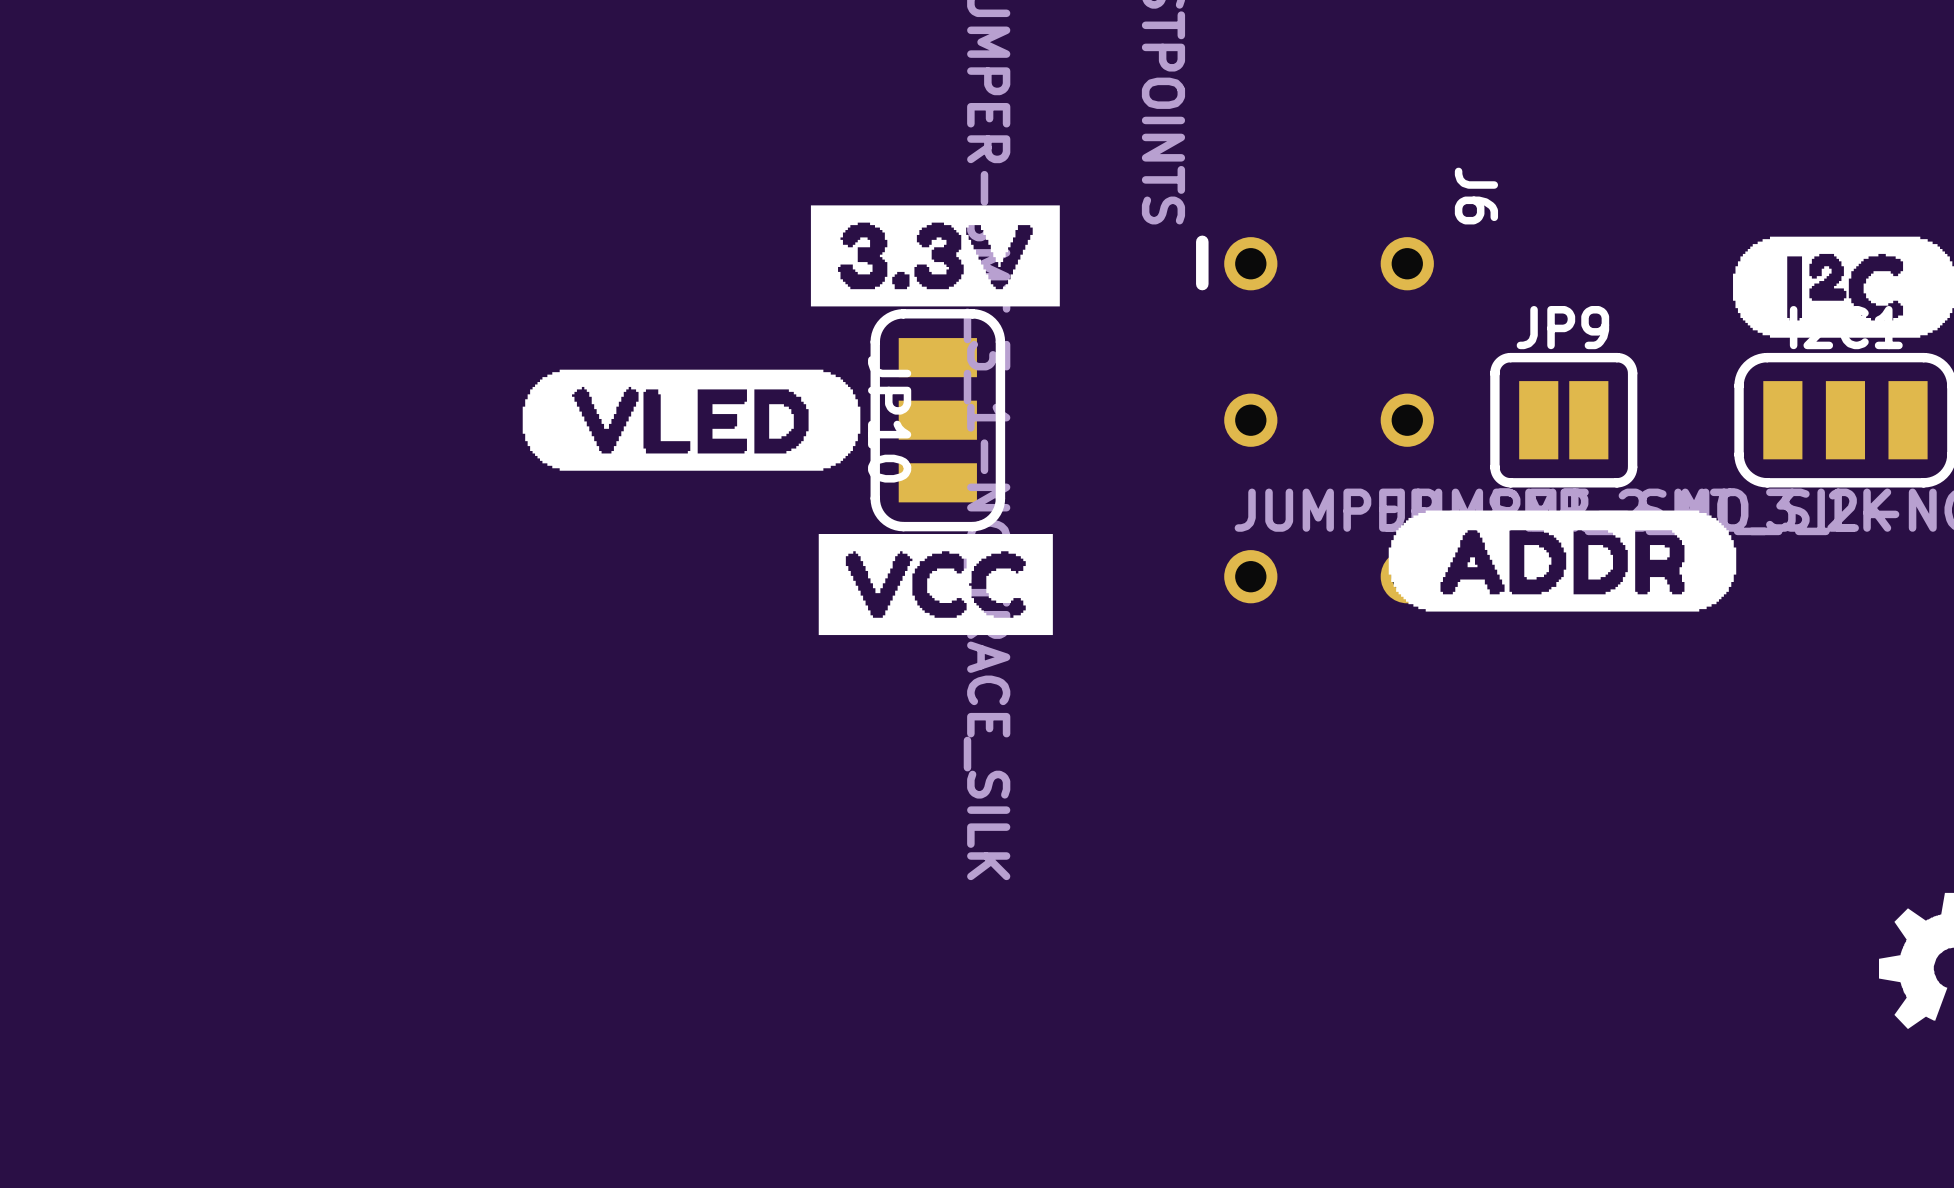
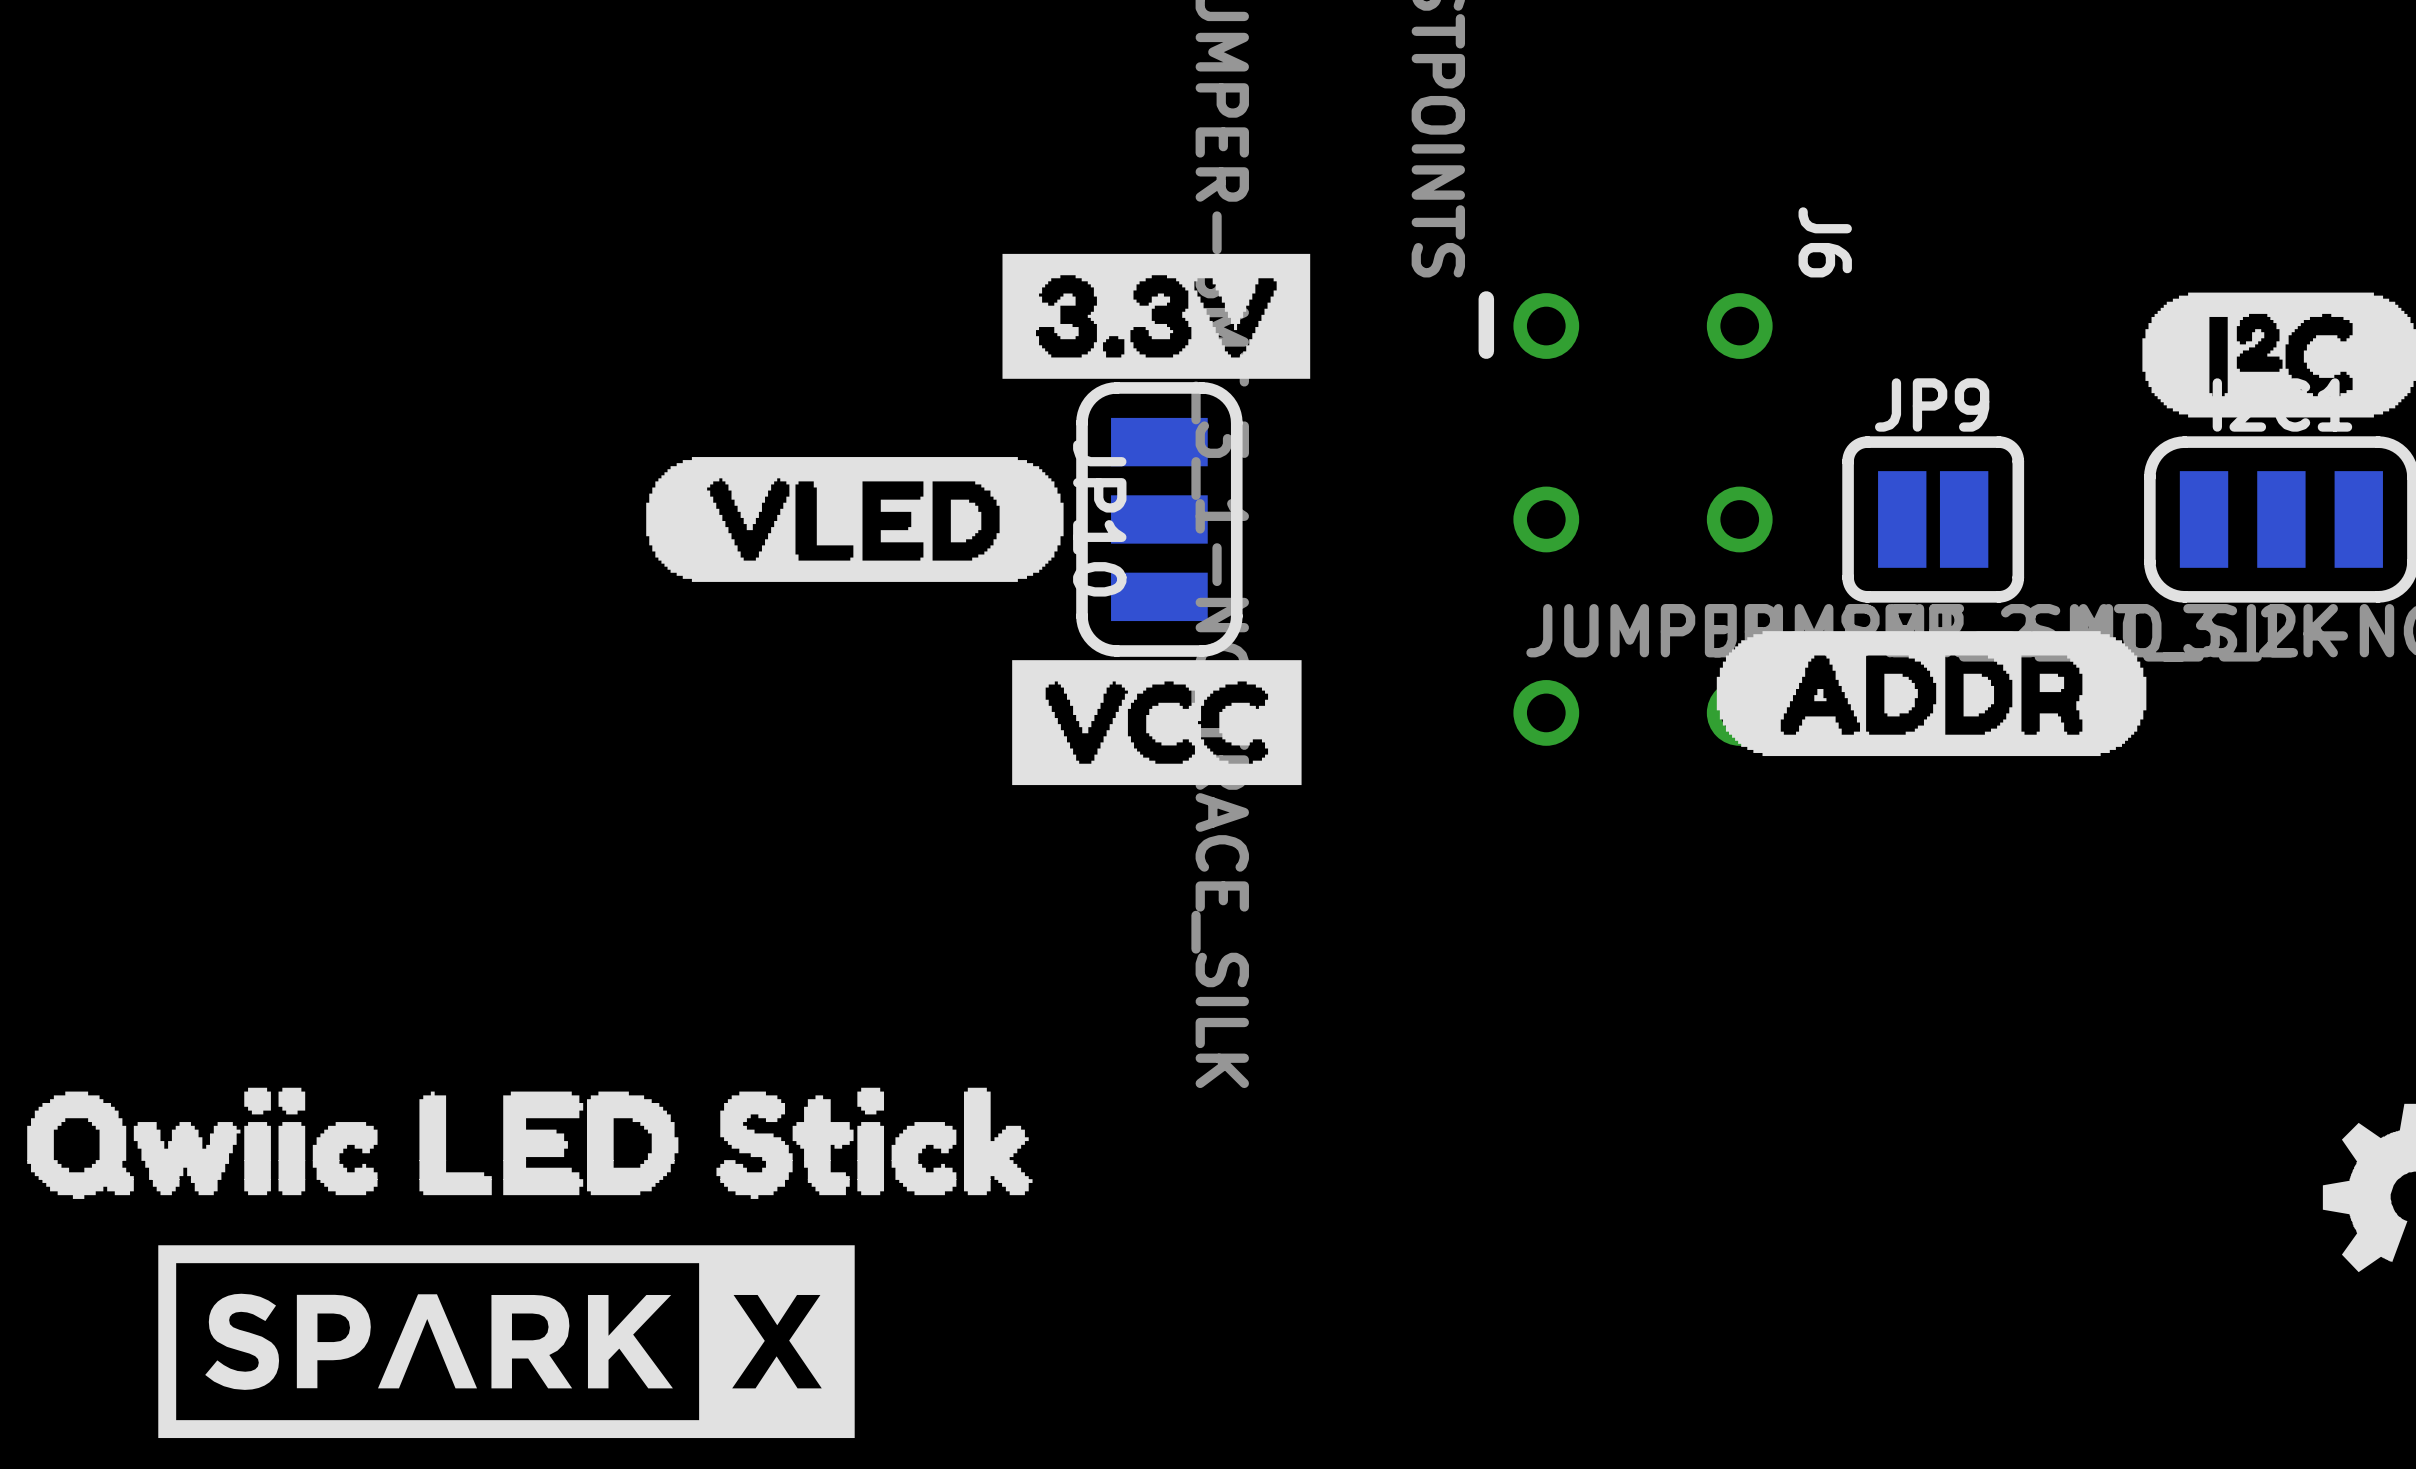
drawing: none -> [27, 1087, 1033, 1439]

